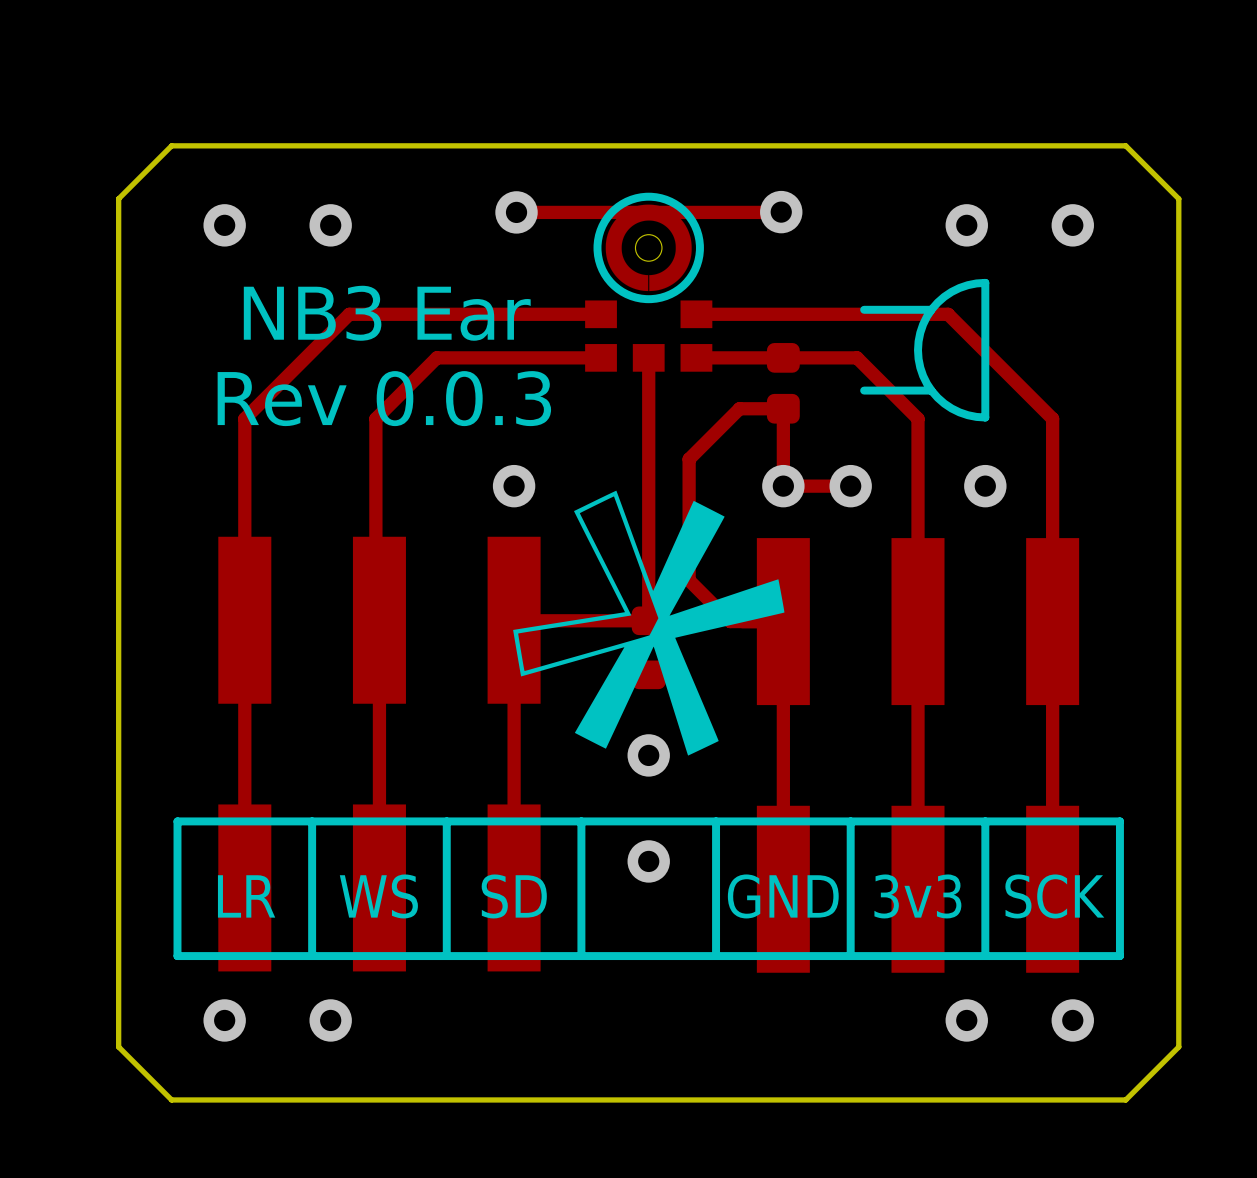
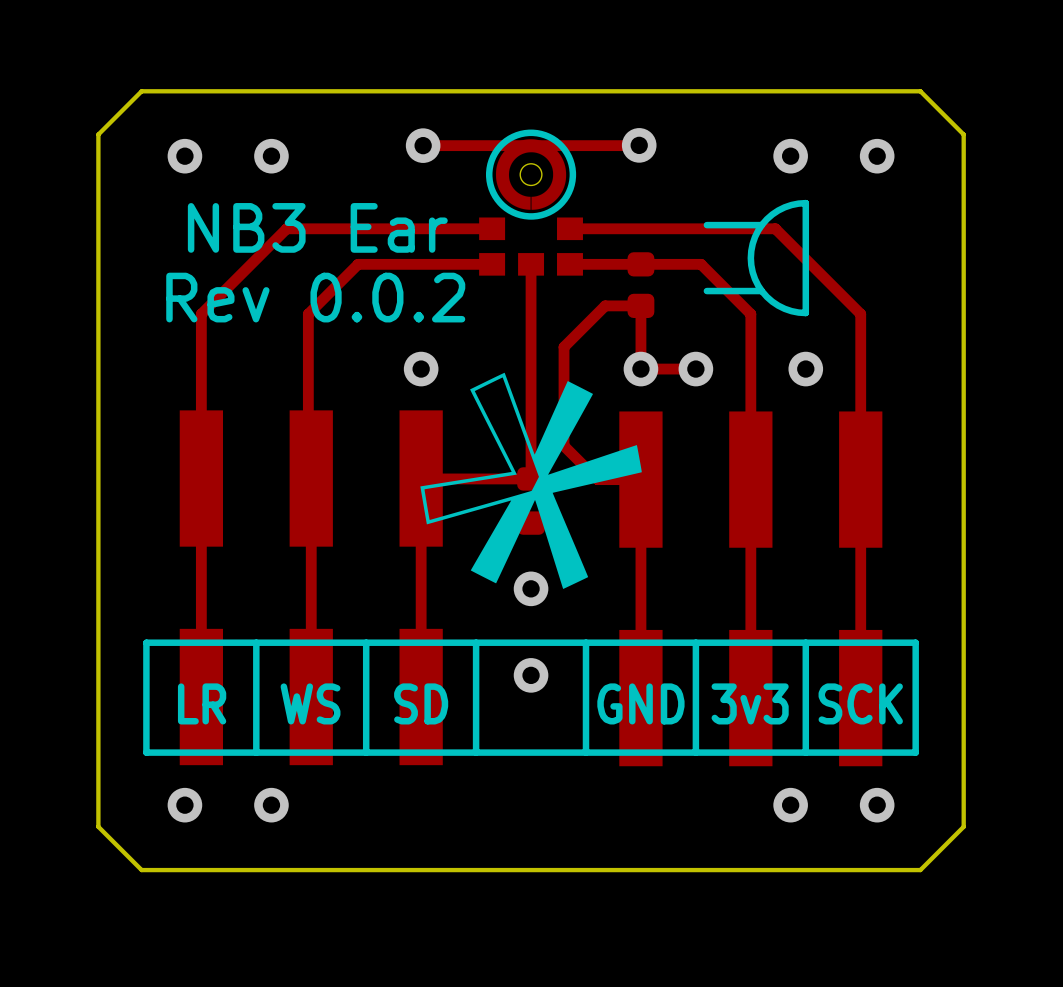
text: Rev 0.0.3 (384, 398) -> Rev 0.0.2 (315, 297)

